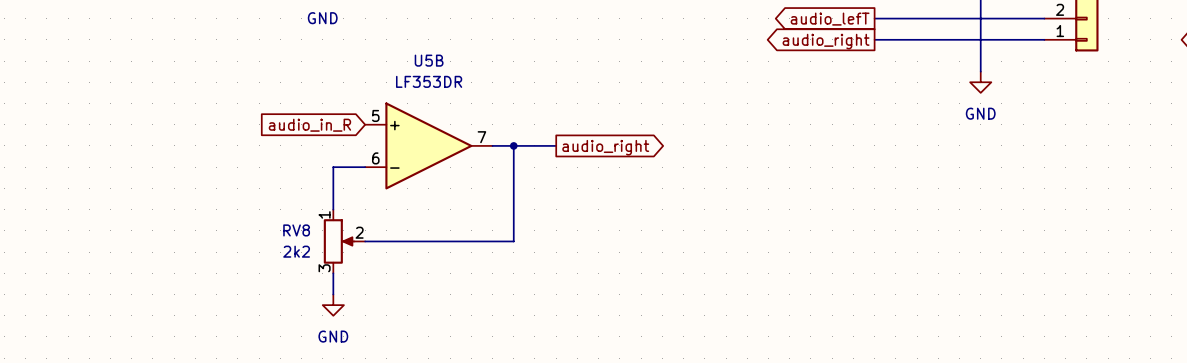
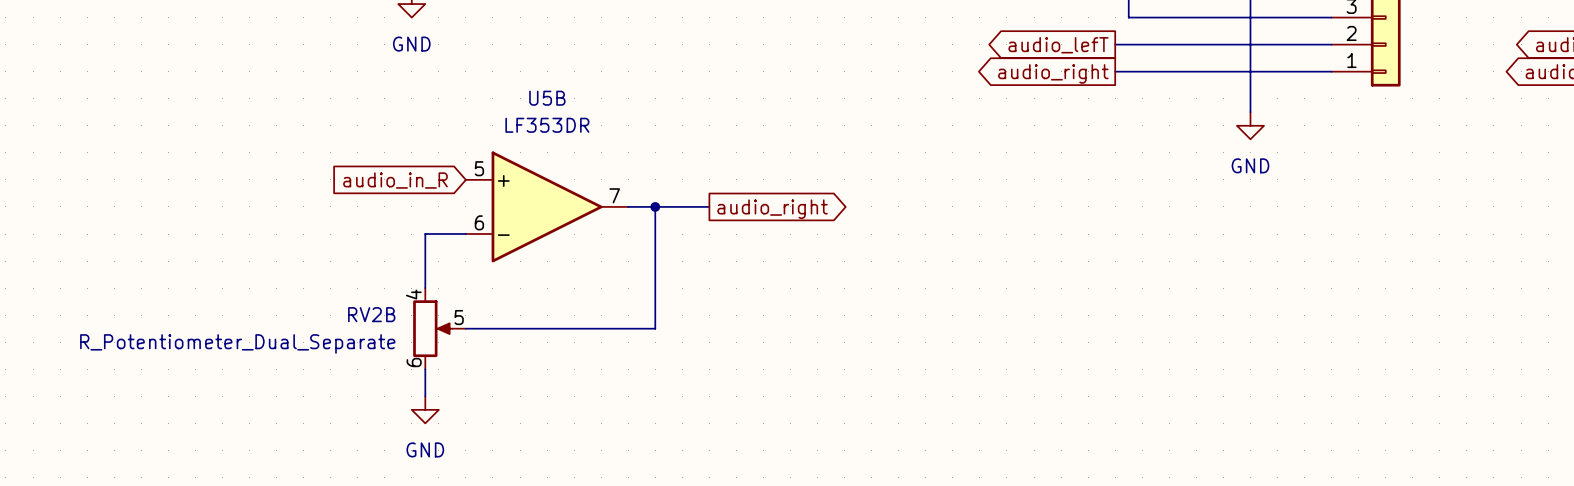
RV8 pin number: 1 (324, 214) -> 4 (413, 294)
RV8 name: RV8 (296, 230) -> RV2B (371, 314)
RV8 pin number: 2 (359, 232) -> 5 (459, 317)
RV8 value: 2k2 (296, 251) -> R_Potentiometer_Dual_Separate (237, 343)
RV8 pin number: 3 (324, 268) -> 6 (414, 362)

